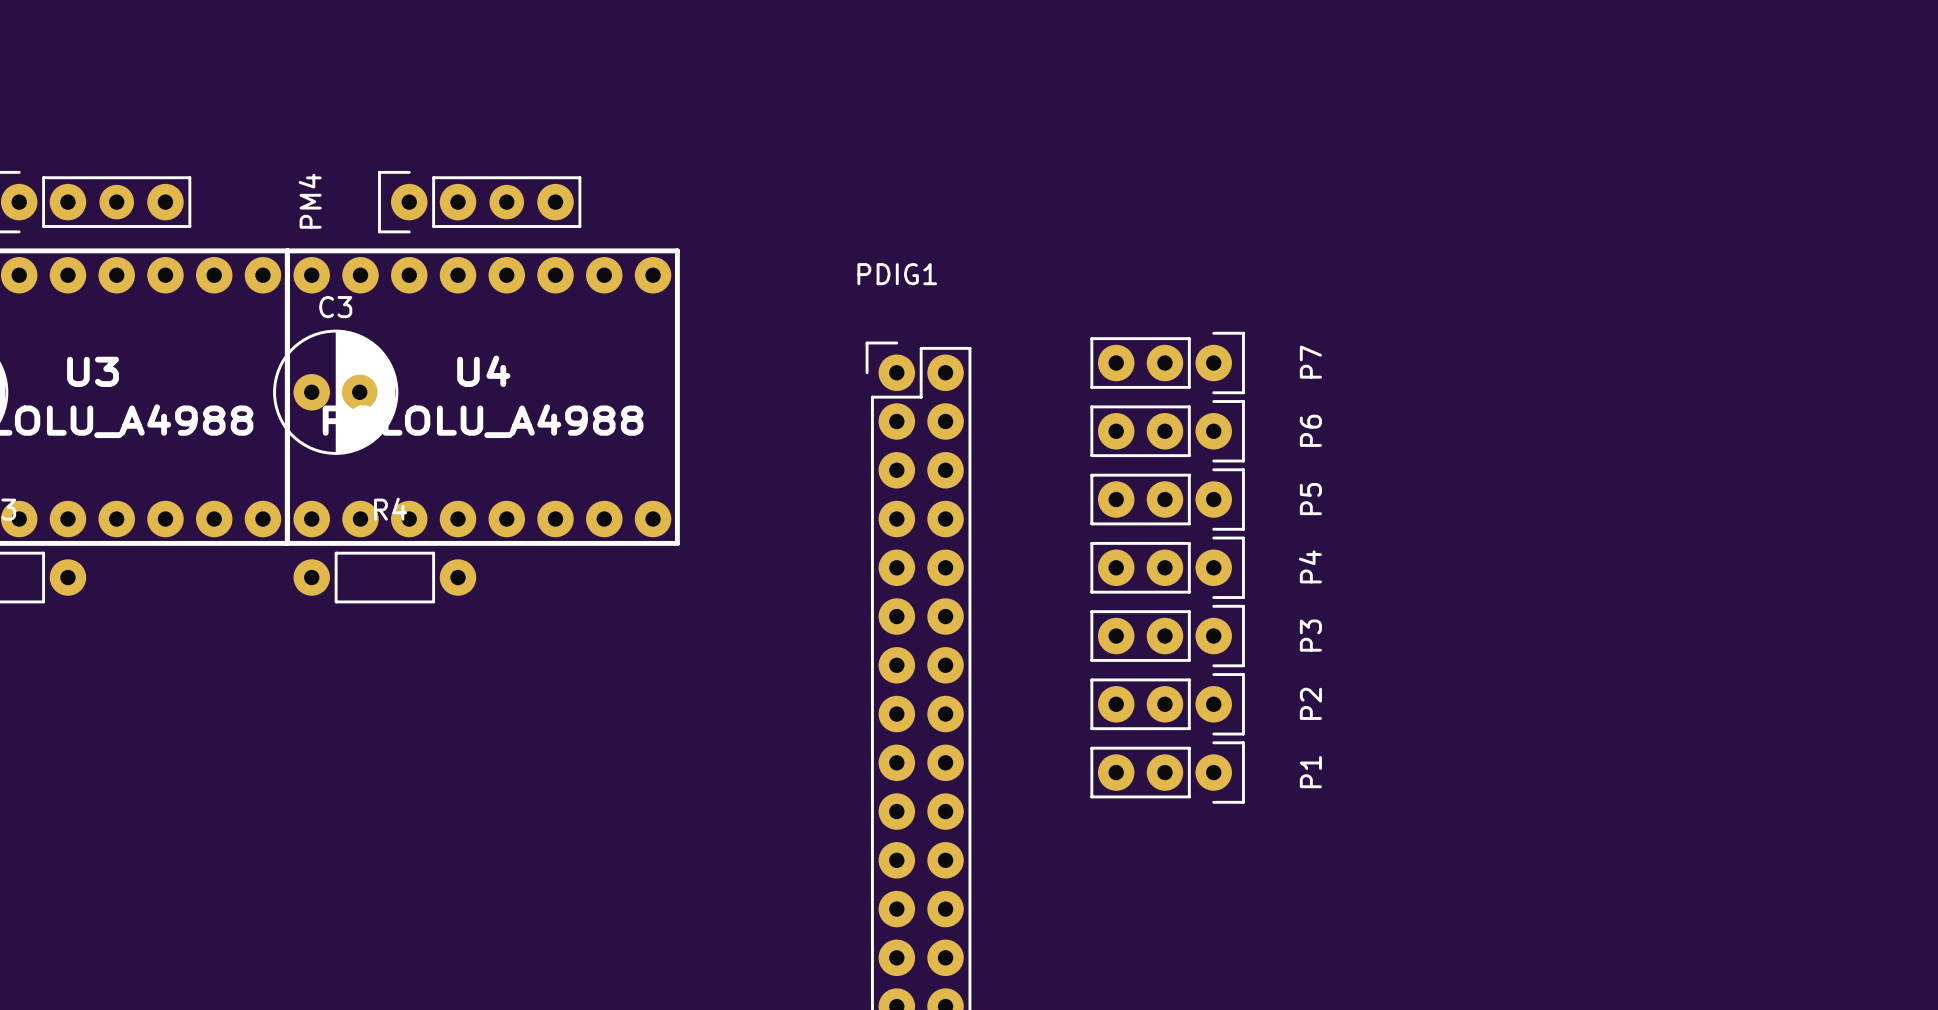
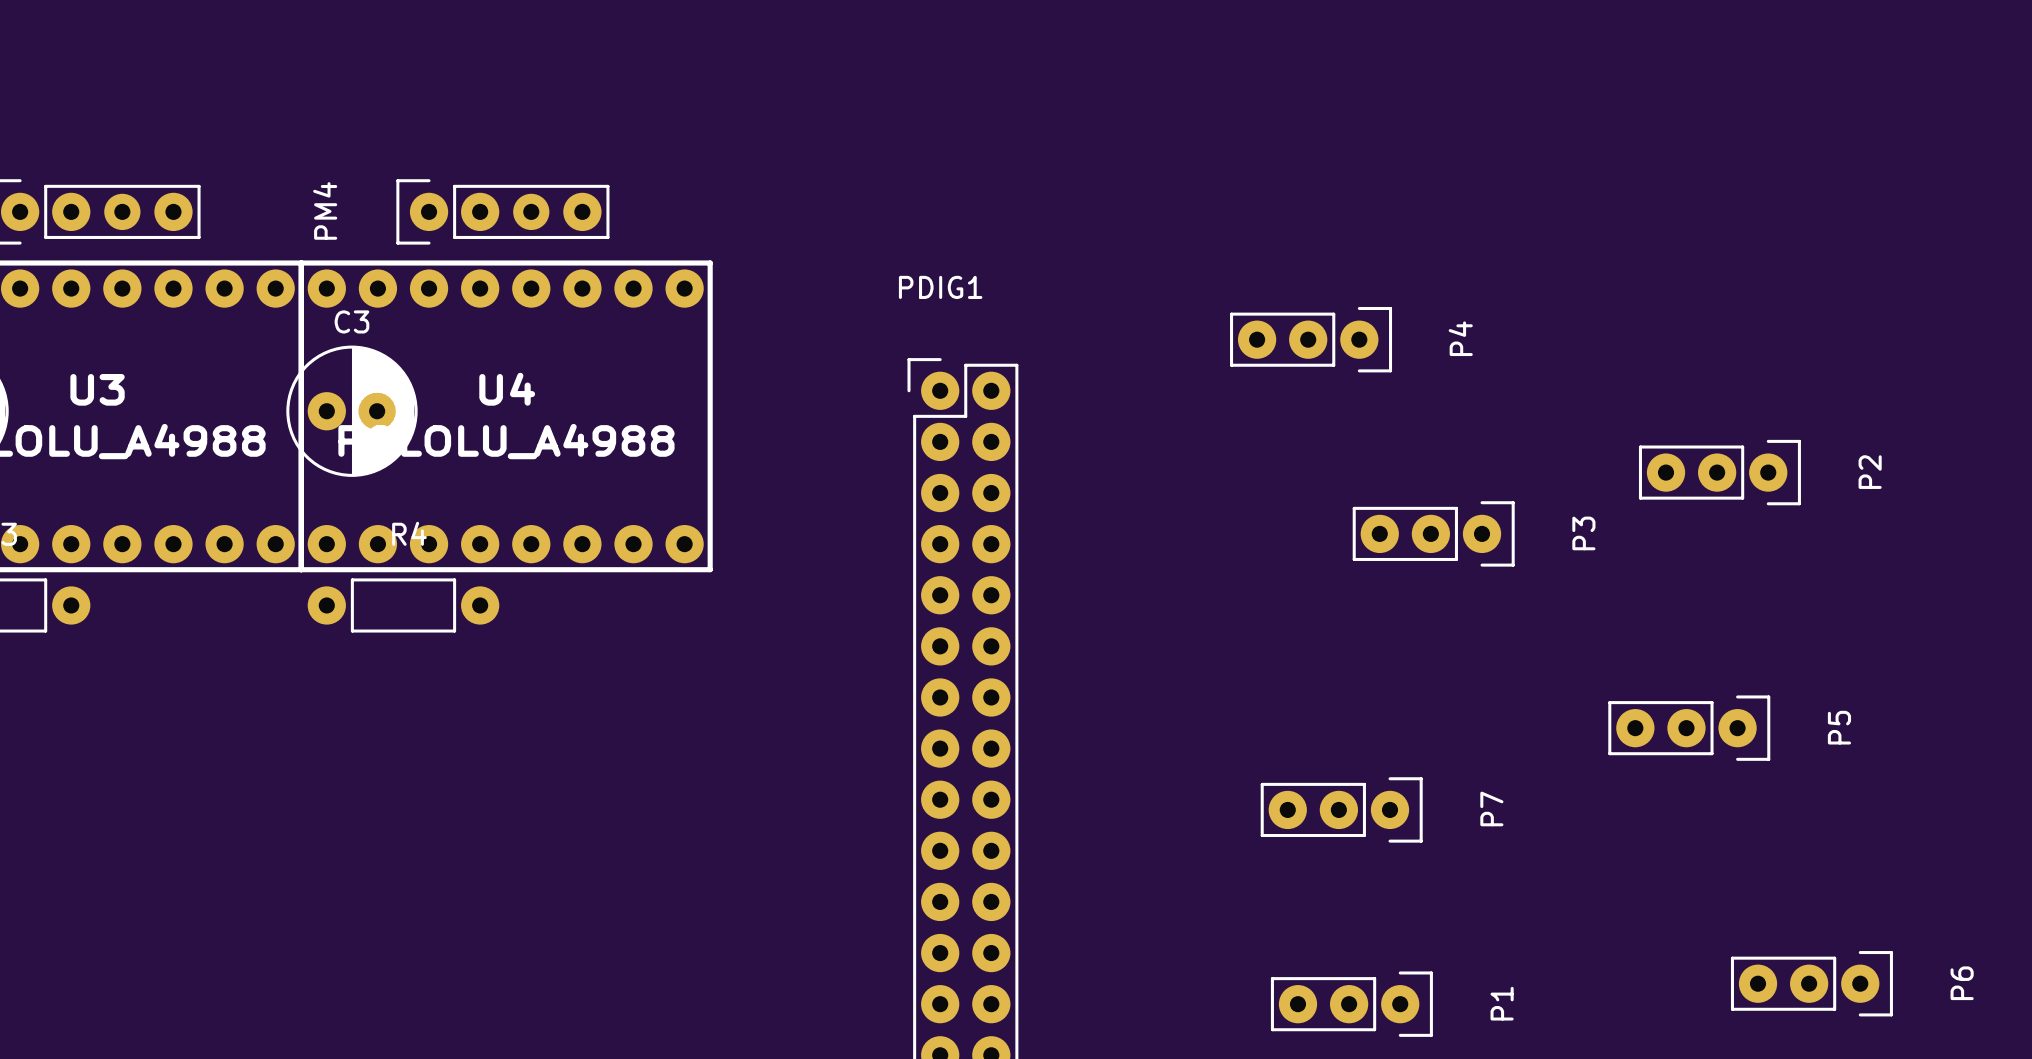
P7 position: (1167, 363) -> (1341, 809)
P6 position: (1167, 431) -> (1811, 983)
P5 position: (1167, 499) -> (1689, 728)
P4 position: (1167, 567) -> (1311, 339)
P3 position: (1167, 636) -> (1433, 533)
P2 position: (1167, 704) -> (1719, 472)
P1 position: (1167, 772) -> (1351, 1004)

